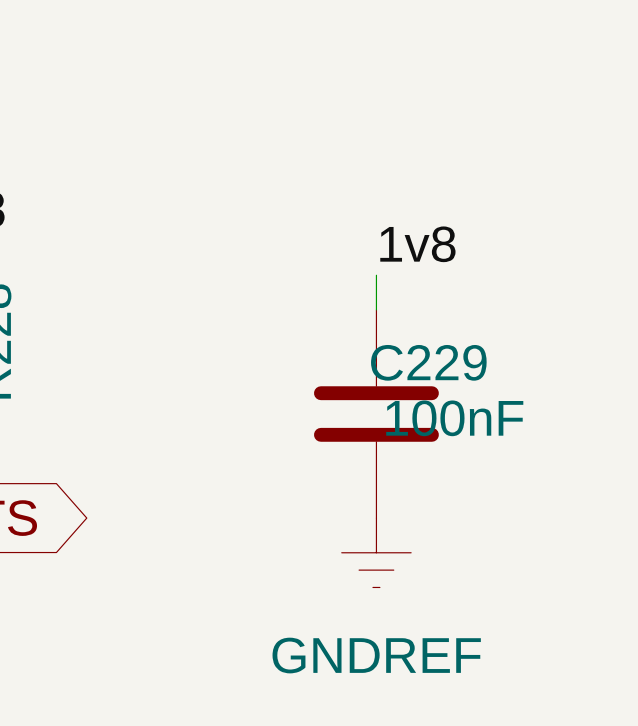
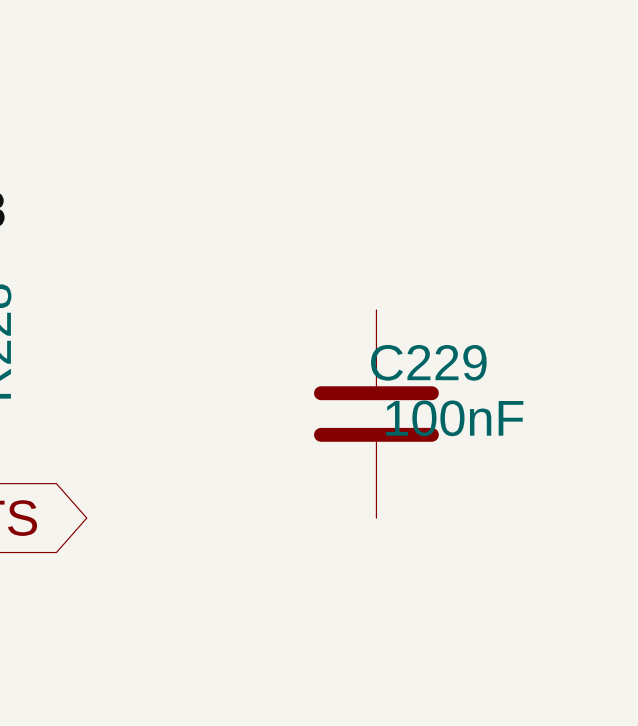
label: 1v8 (417, 244) -> none
wire: (376, 275) (376, 309) -> none
power symbol: GNDREF (376, 552) -> none

